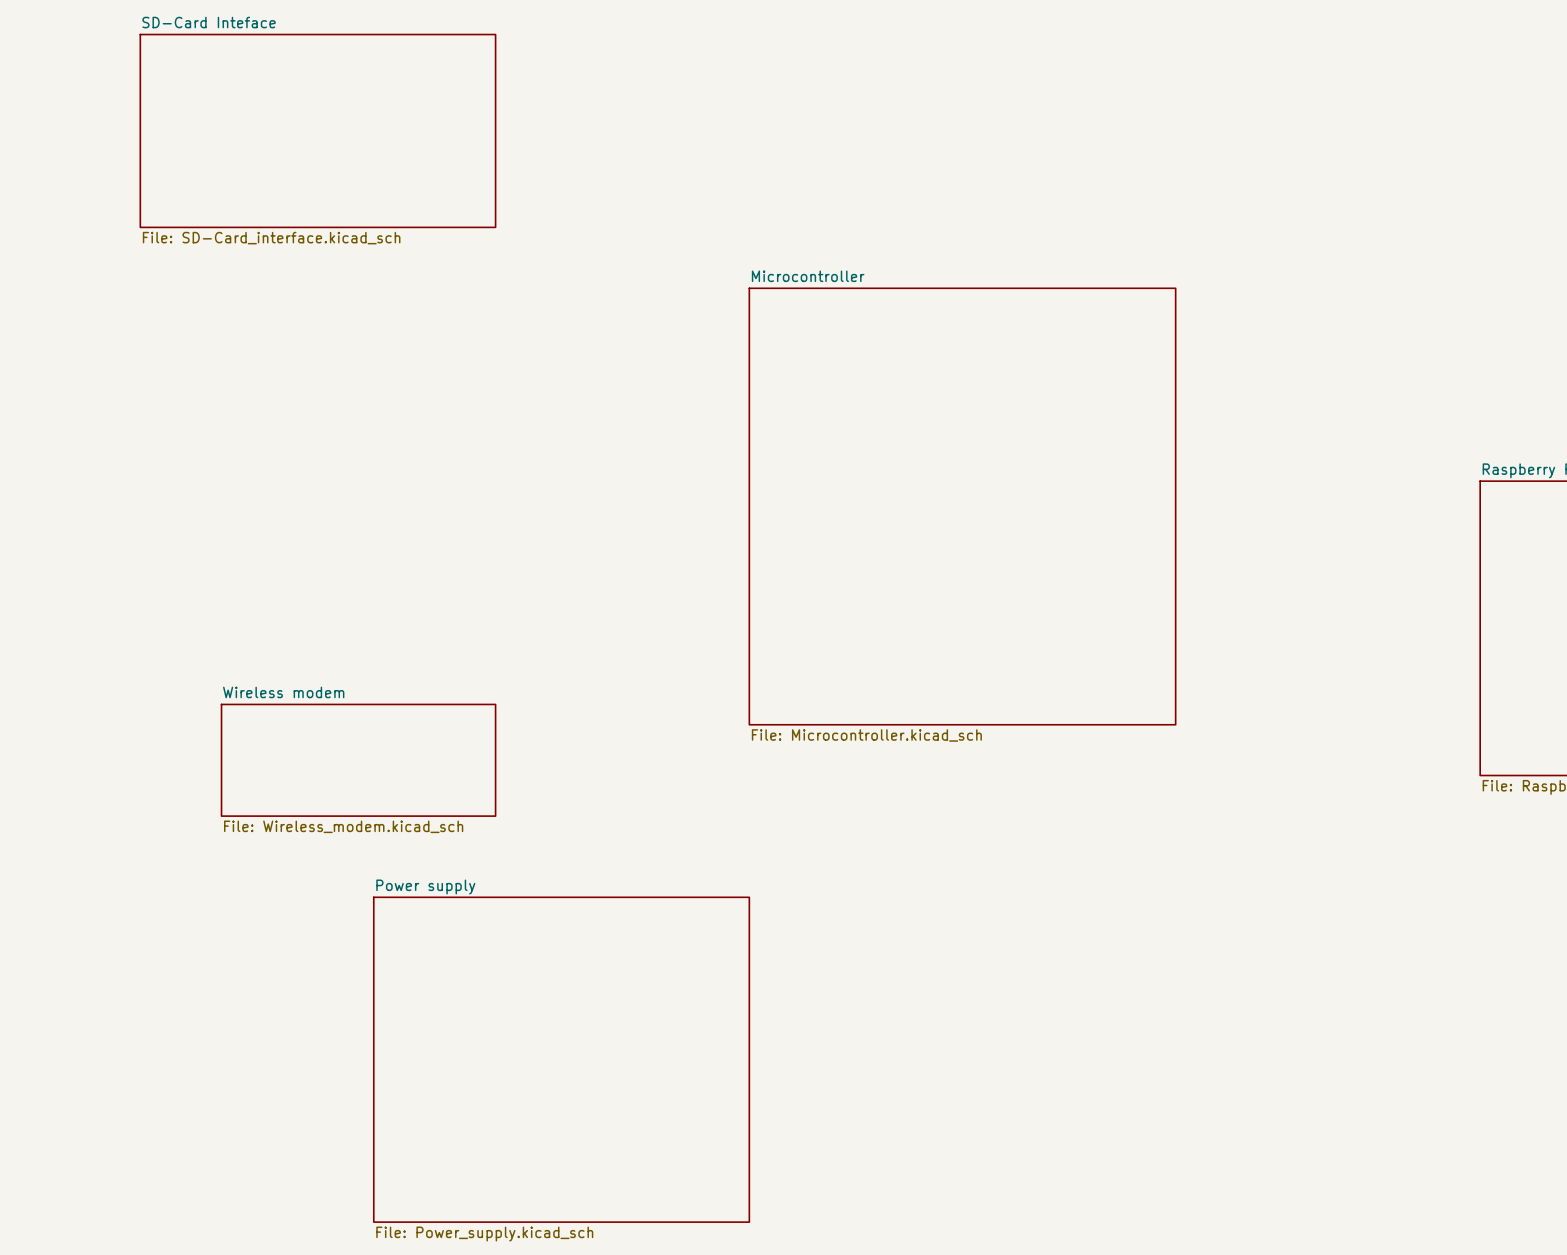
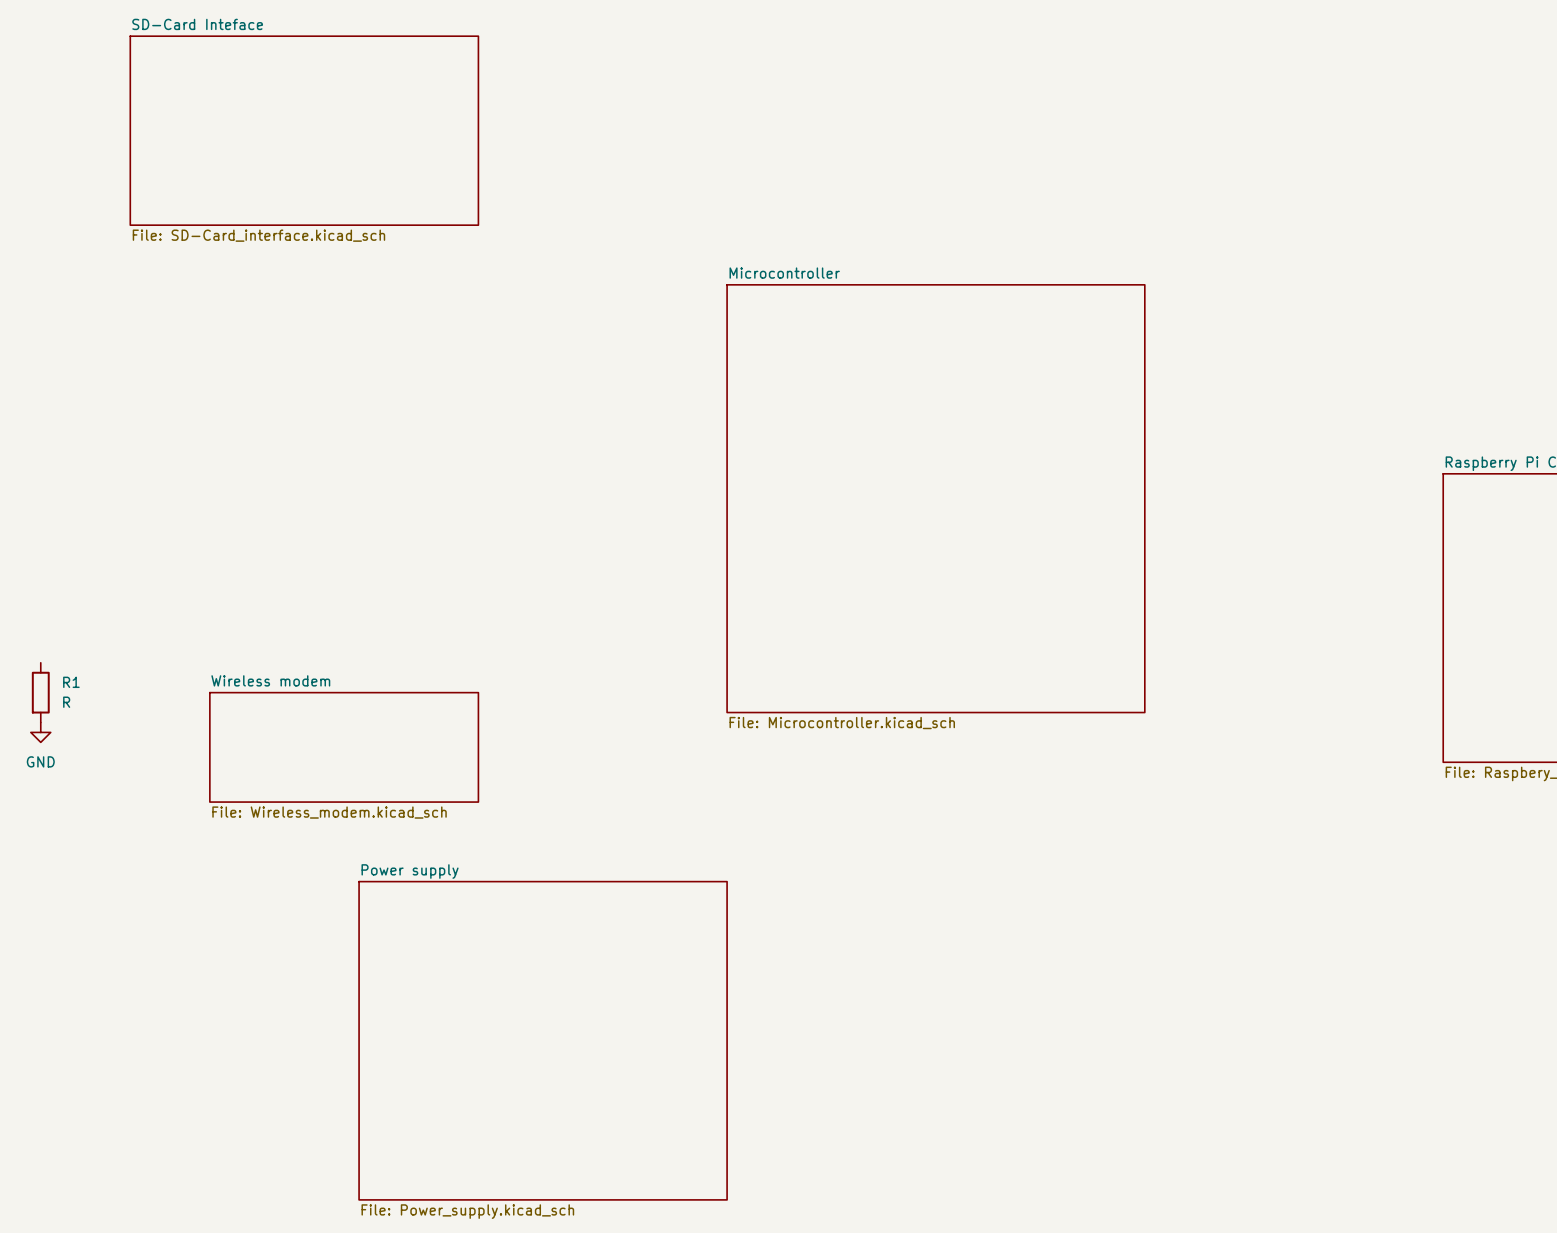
R1: none -> R (40, 692)
power symbol: none -> GND (40, 732)

